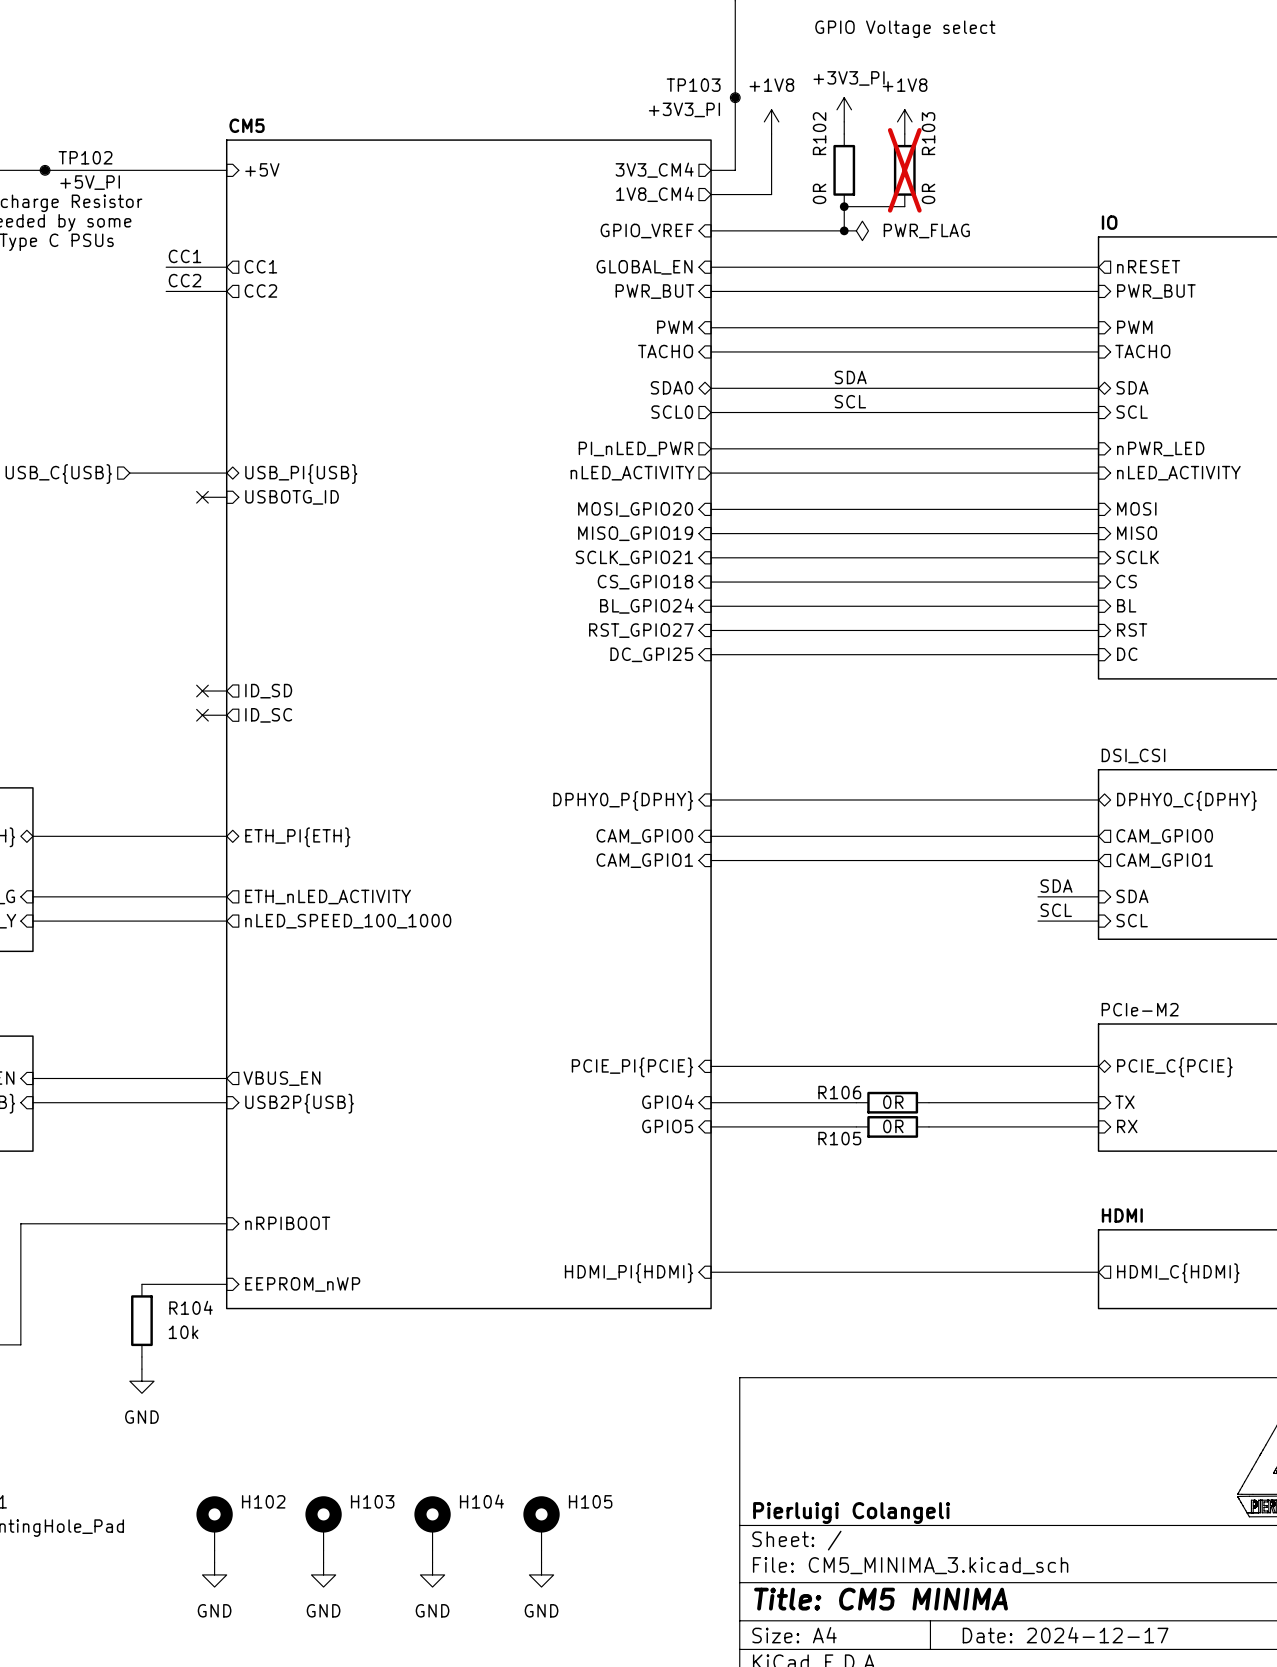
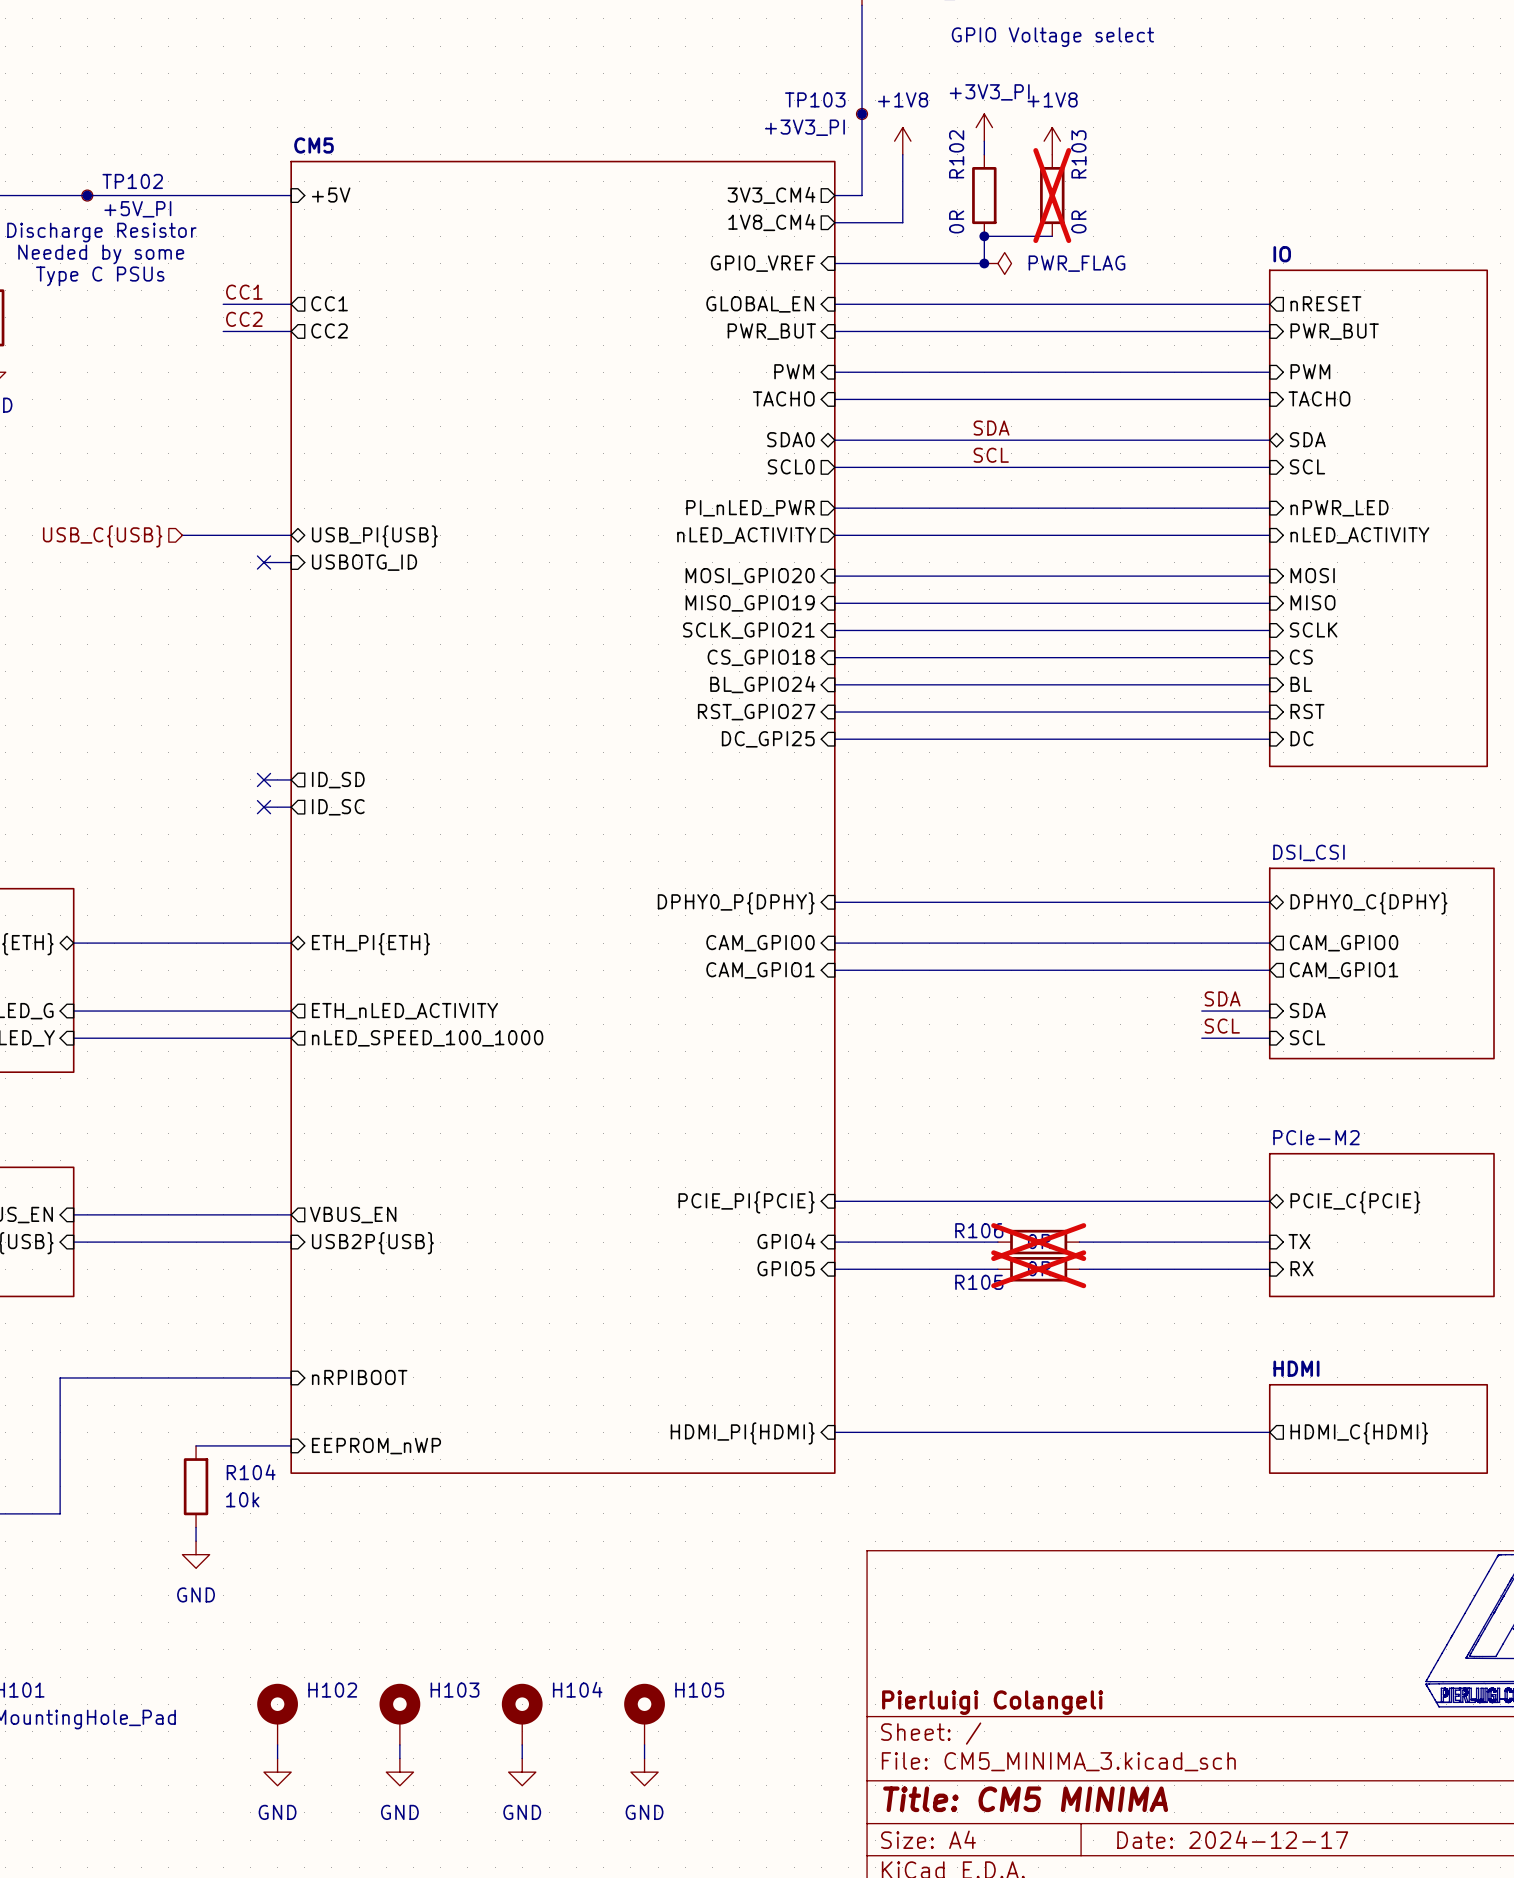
R106 do-not-place cross: none -> (1038, 1242)
R105 do-not-place cross: none -> (1038, 1269)

